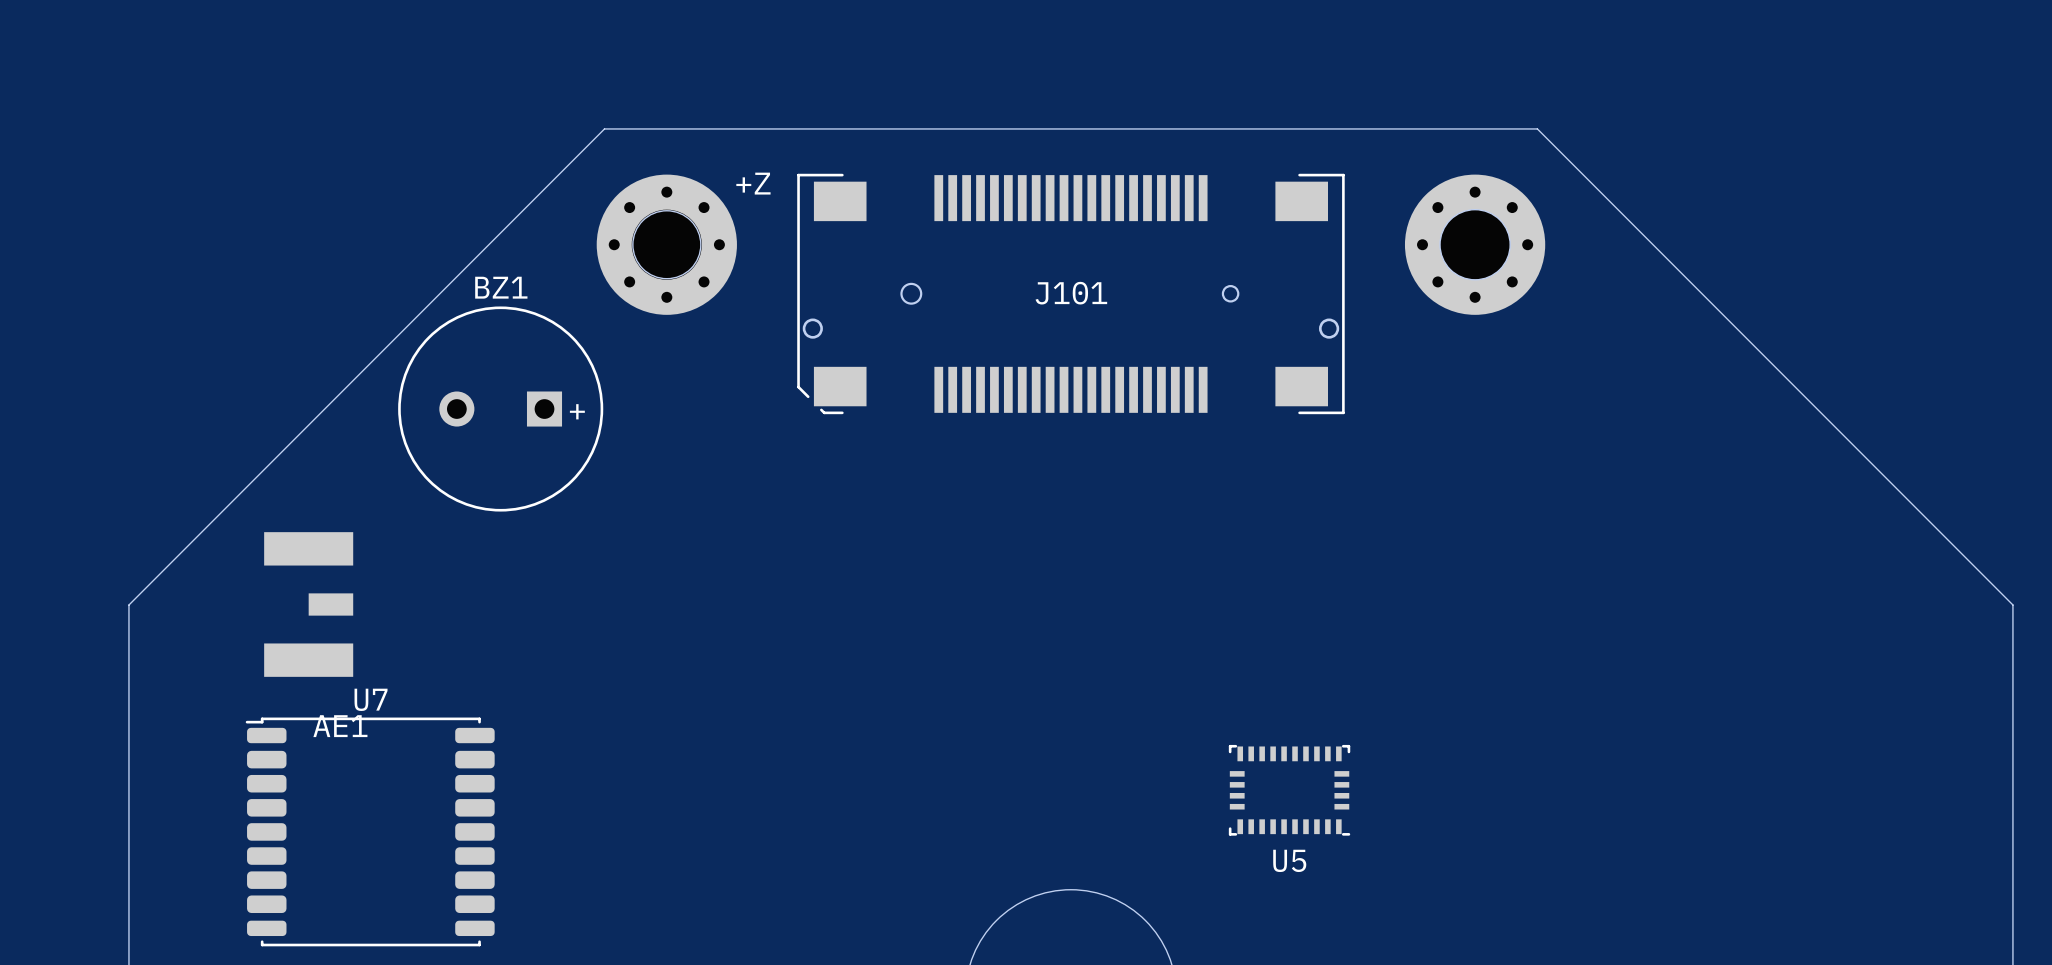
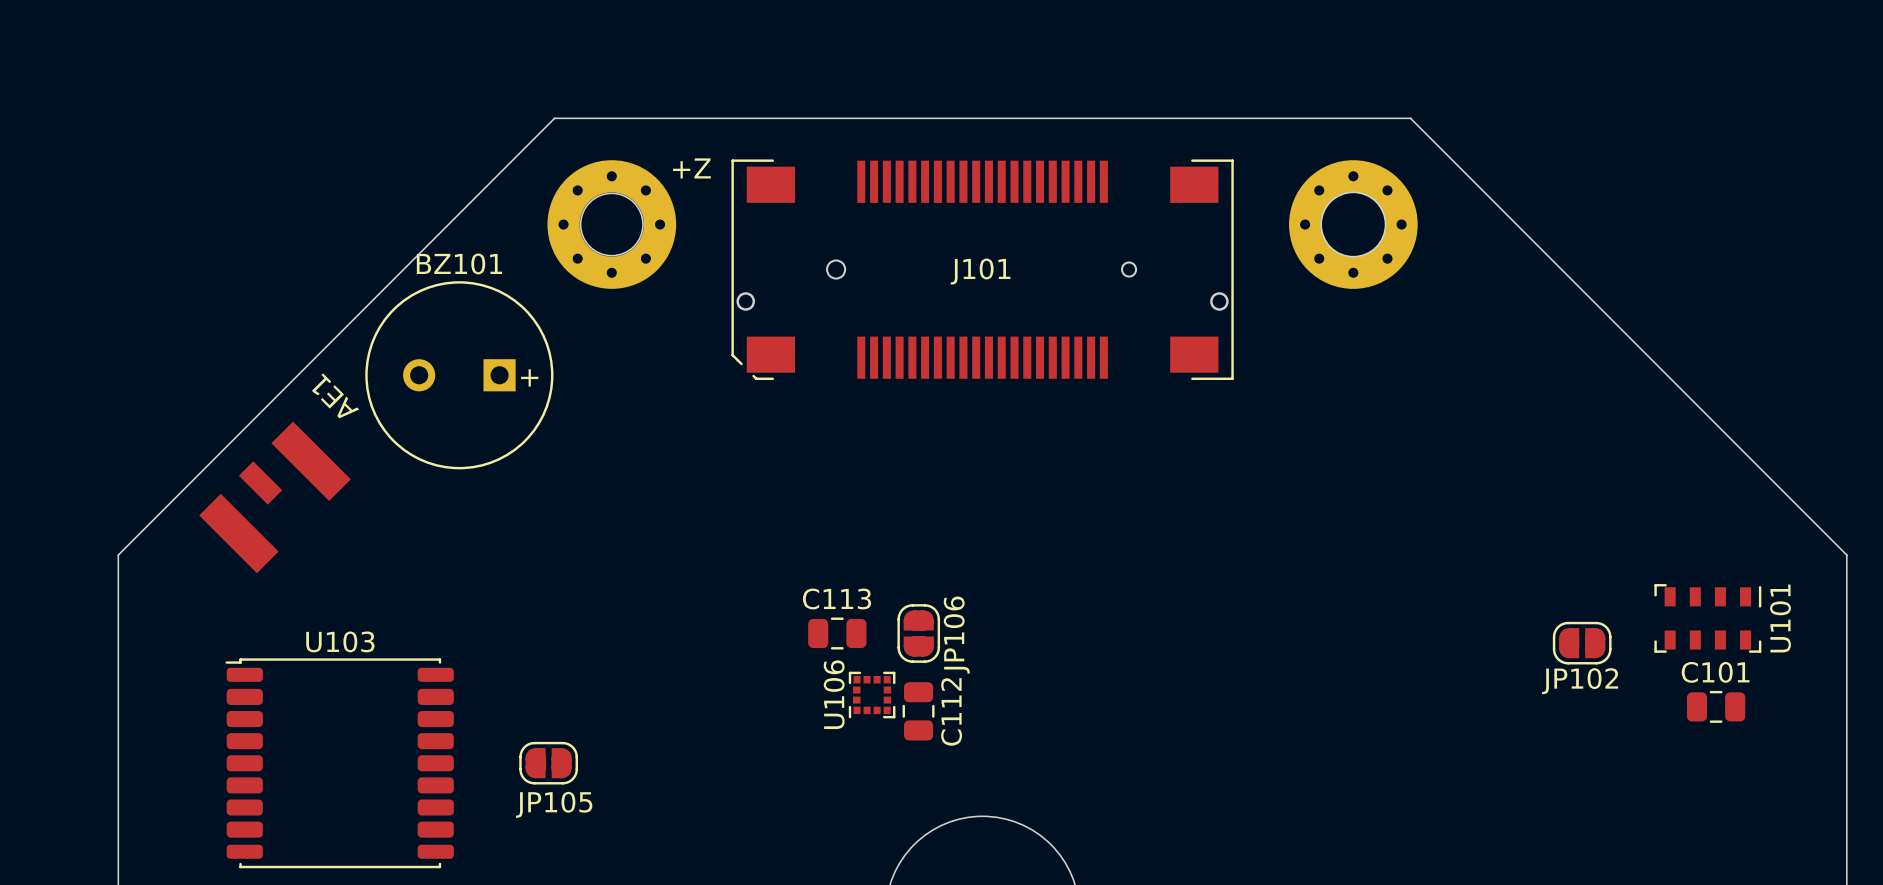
BZ1 name: BZ1 (501, 287) -> BZ101 (459, 263)
AE1 rotation: 0° (308, 604) -> 135° counterclockwise (275, 497)
U101: none -> (1707, 618)
C113: none -> (837, 633)
JP106: none -> (918, 633)
U7 name: U7 (371, 699) -> U103 (340, 641)
JP102: none -> (1582, 643)
U106: none -> (872, 695)
C101: none -> (1716, 706)
C112: none -> (918, 711)
U5: (1289, 790) -> none
JP105: none -> (548, 763)

